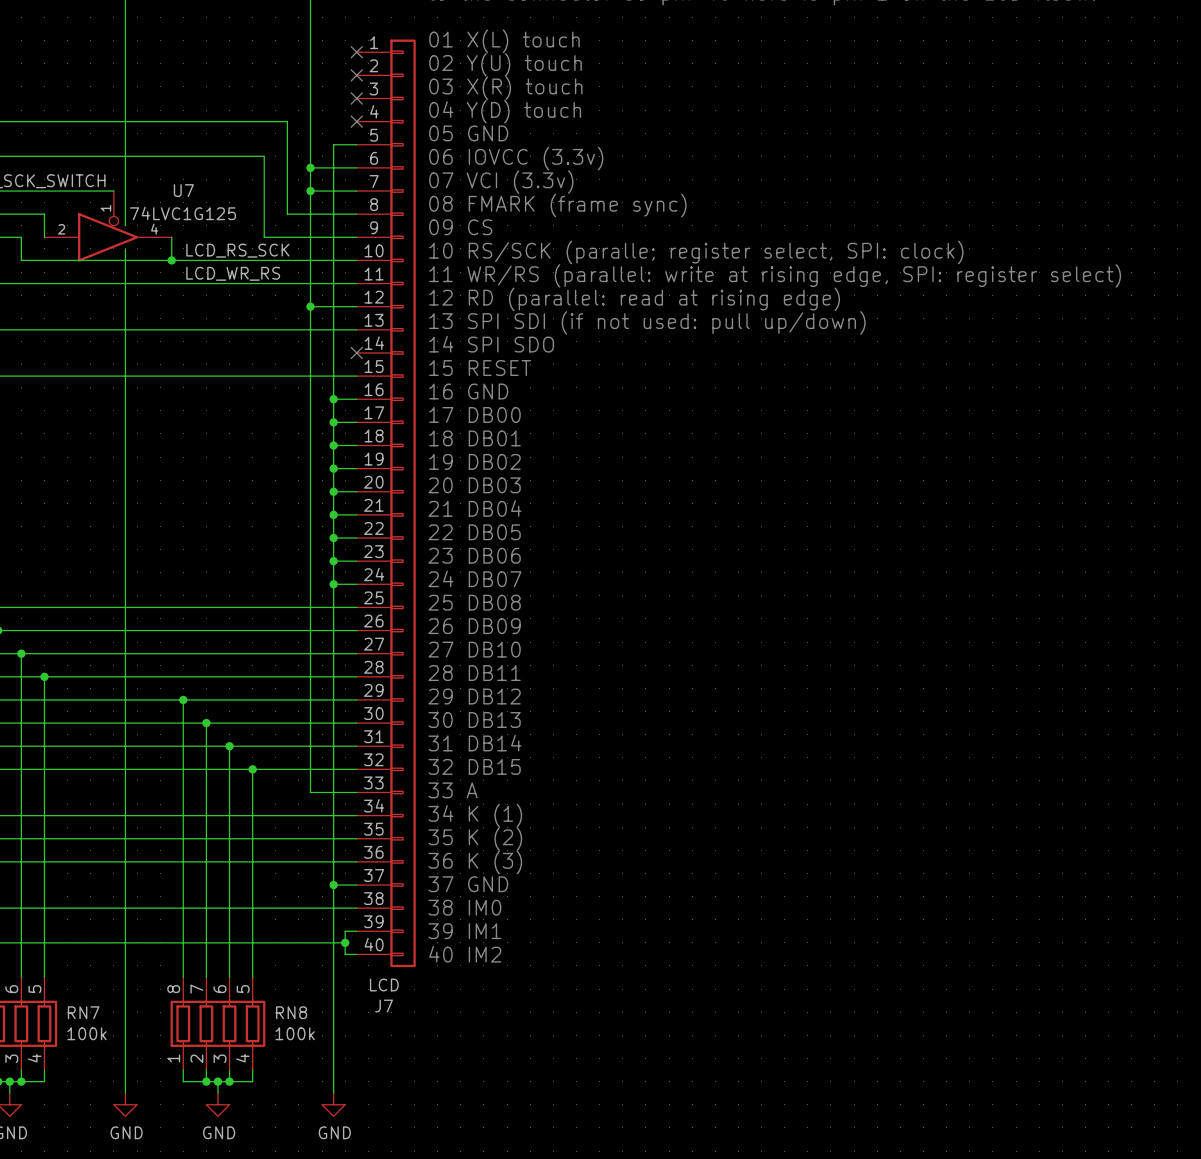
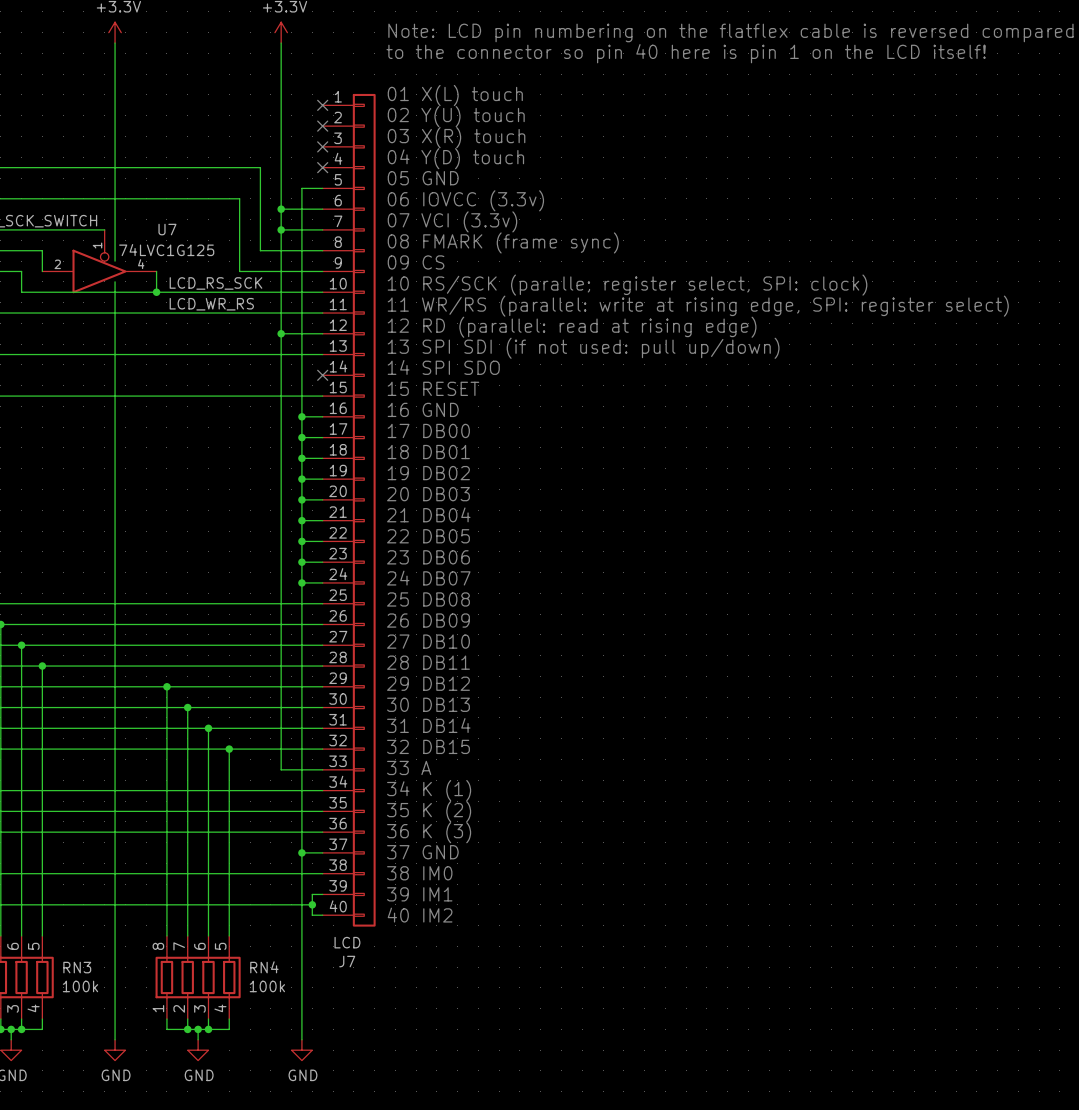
RN7 name: RN7 (83, 1012) -> RN3 (77, 967)
RN8 name: RN8 (291, 1012) -> RN4 (264, 967)

